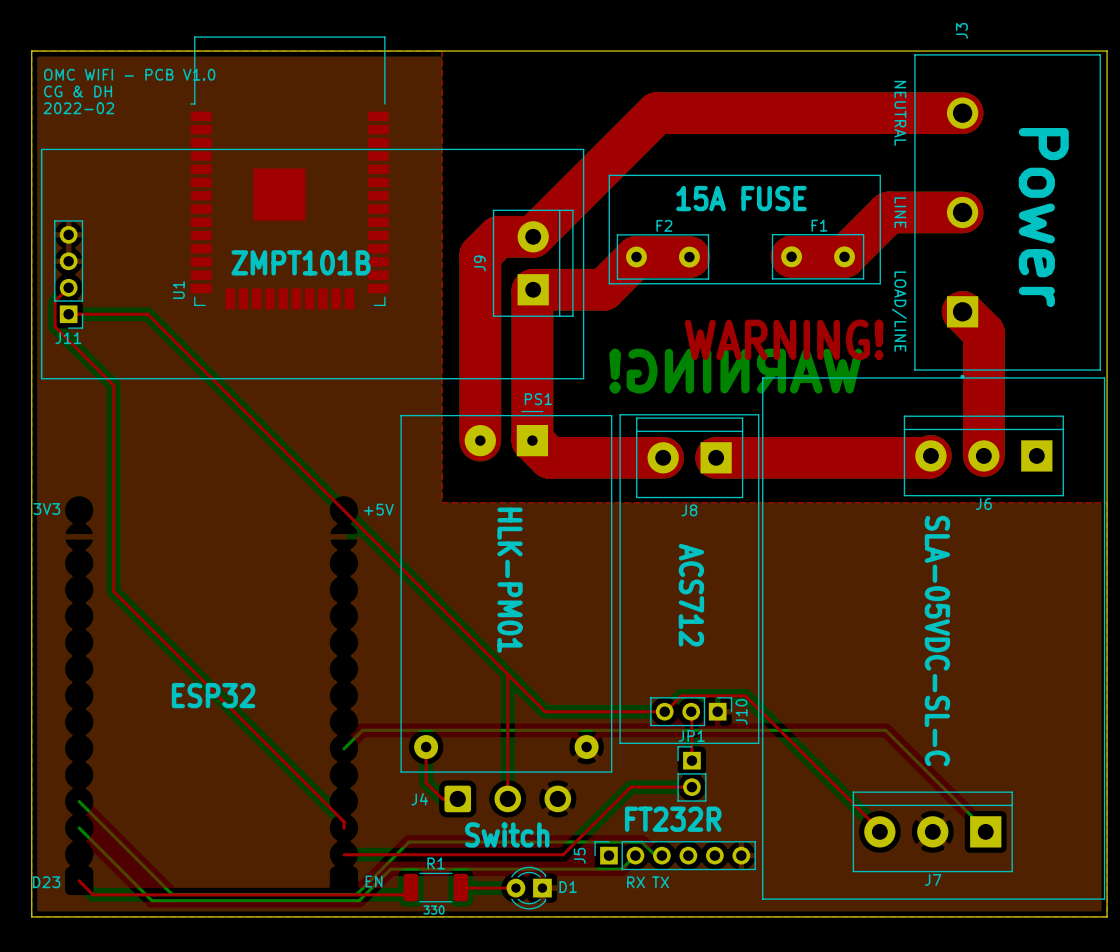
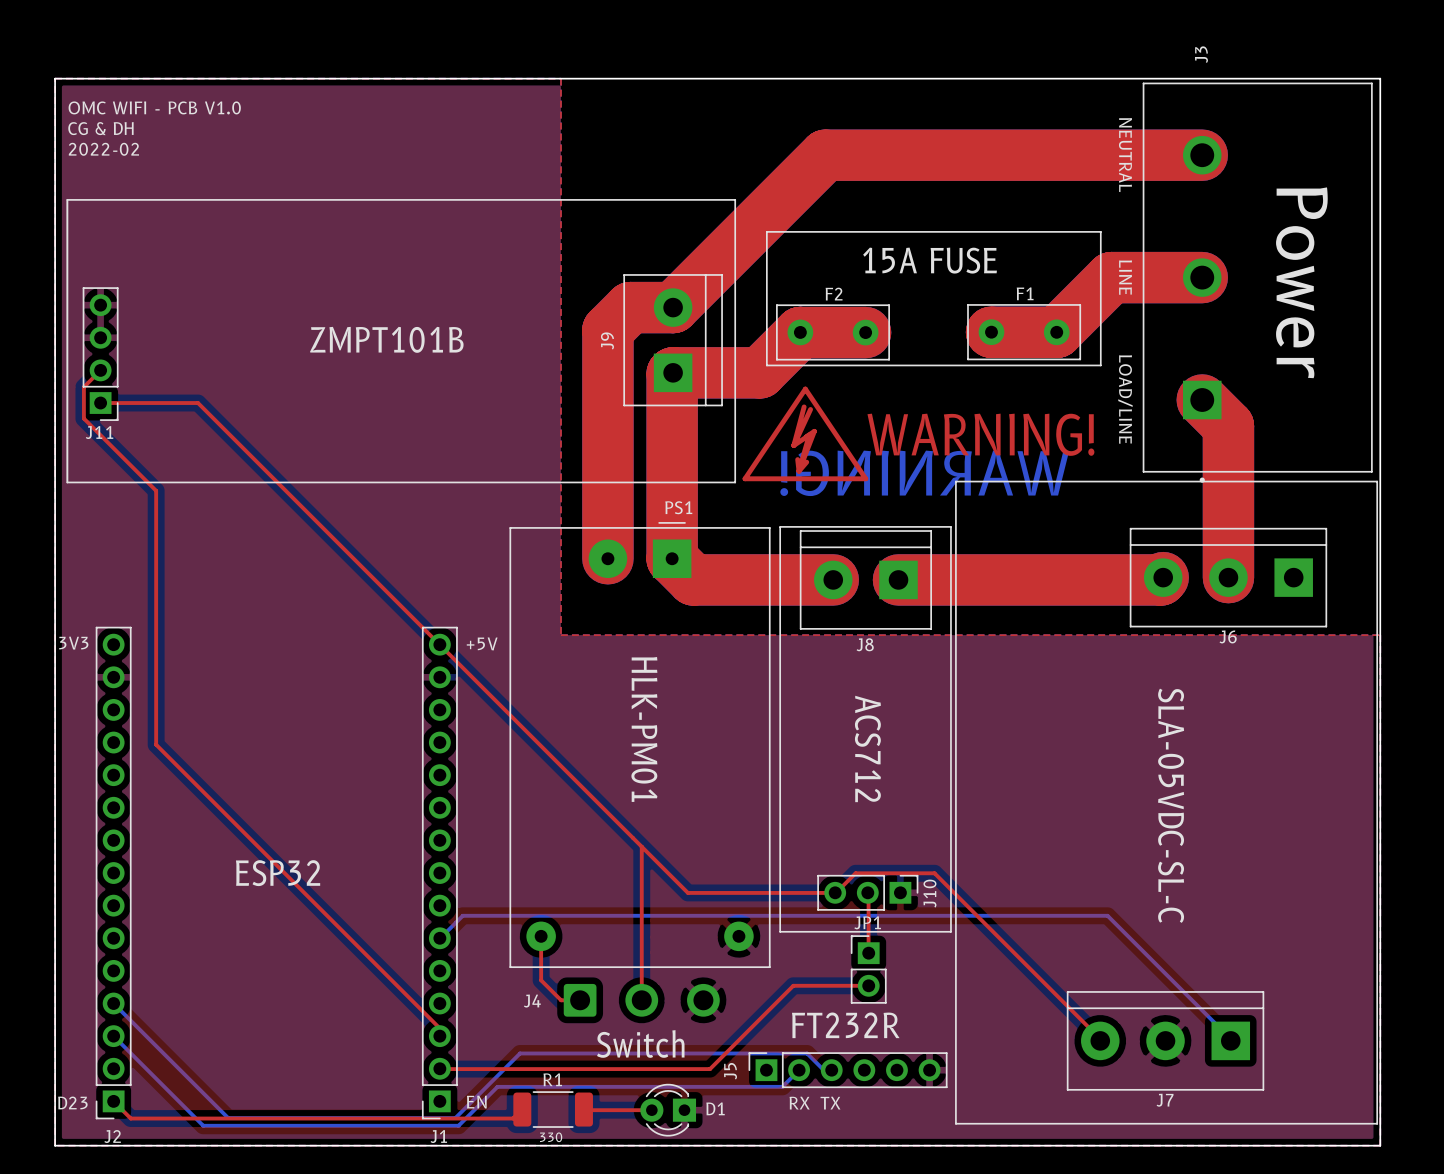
U1: (289, 172) -> none
drawing: none -> [742, 386, 869, 482]
J2: none -> (113, 873)
J1: none -> (439, 873)

